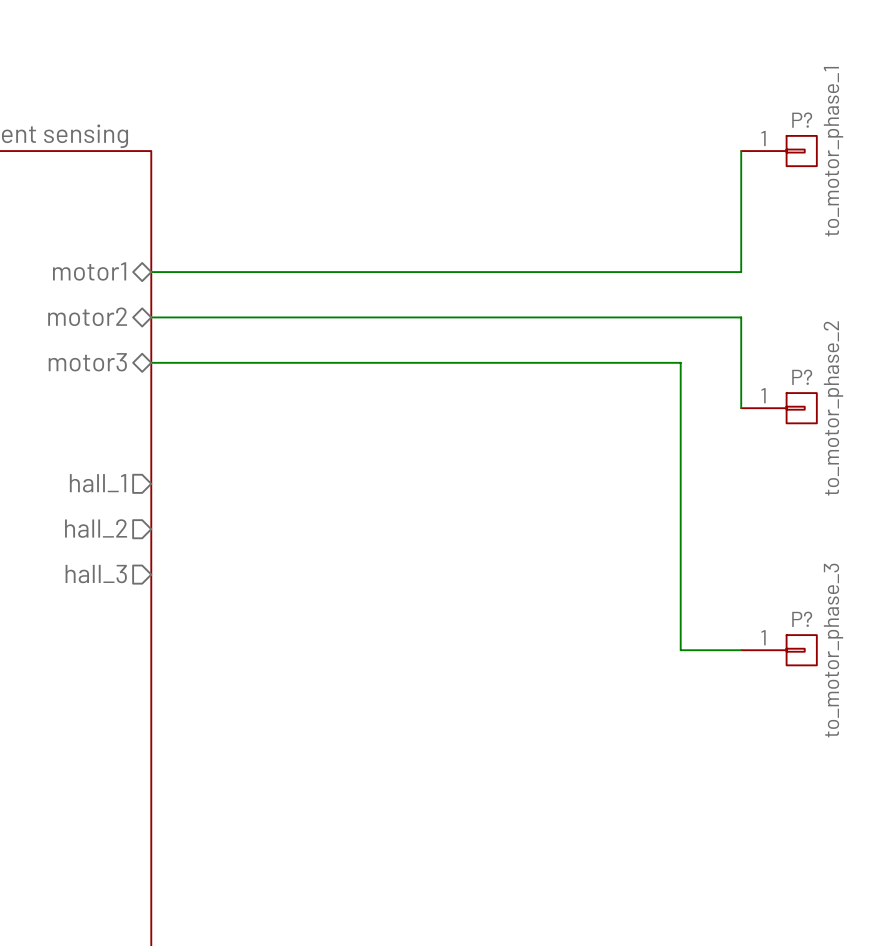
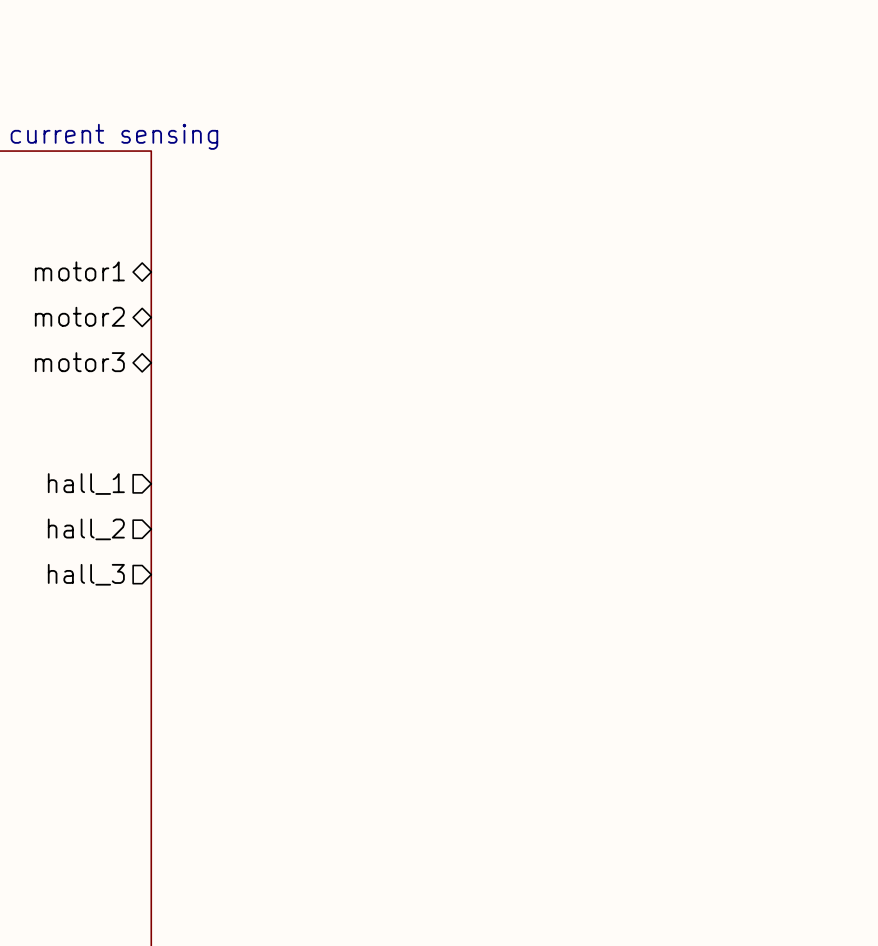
wire: (741, 151) (741, 272) (151, 272) -> none
P?: to_motor_phase_1 (779, 151) -> none
wire: (151, 317) (741, 317) (741, 408) -> none
wire: (151, 362) (680, 362) (680, 650) (741, 650) -> none
P?: to_motor_phase_2 (779, 408) -> none
P?: to_motor_phase_3 (779, 650) -> none

